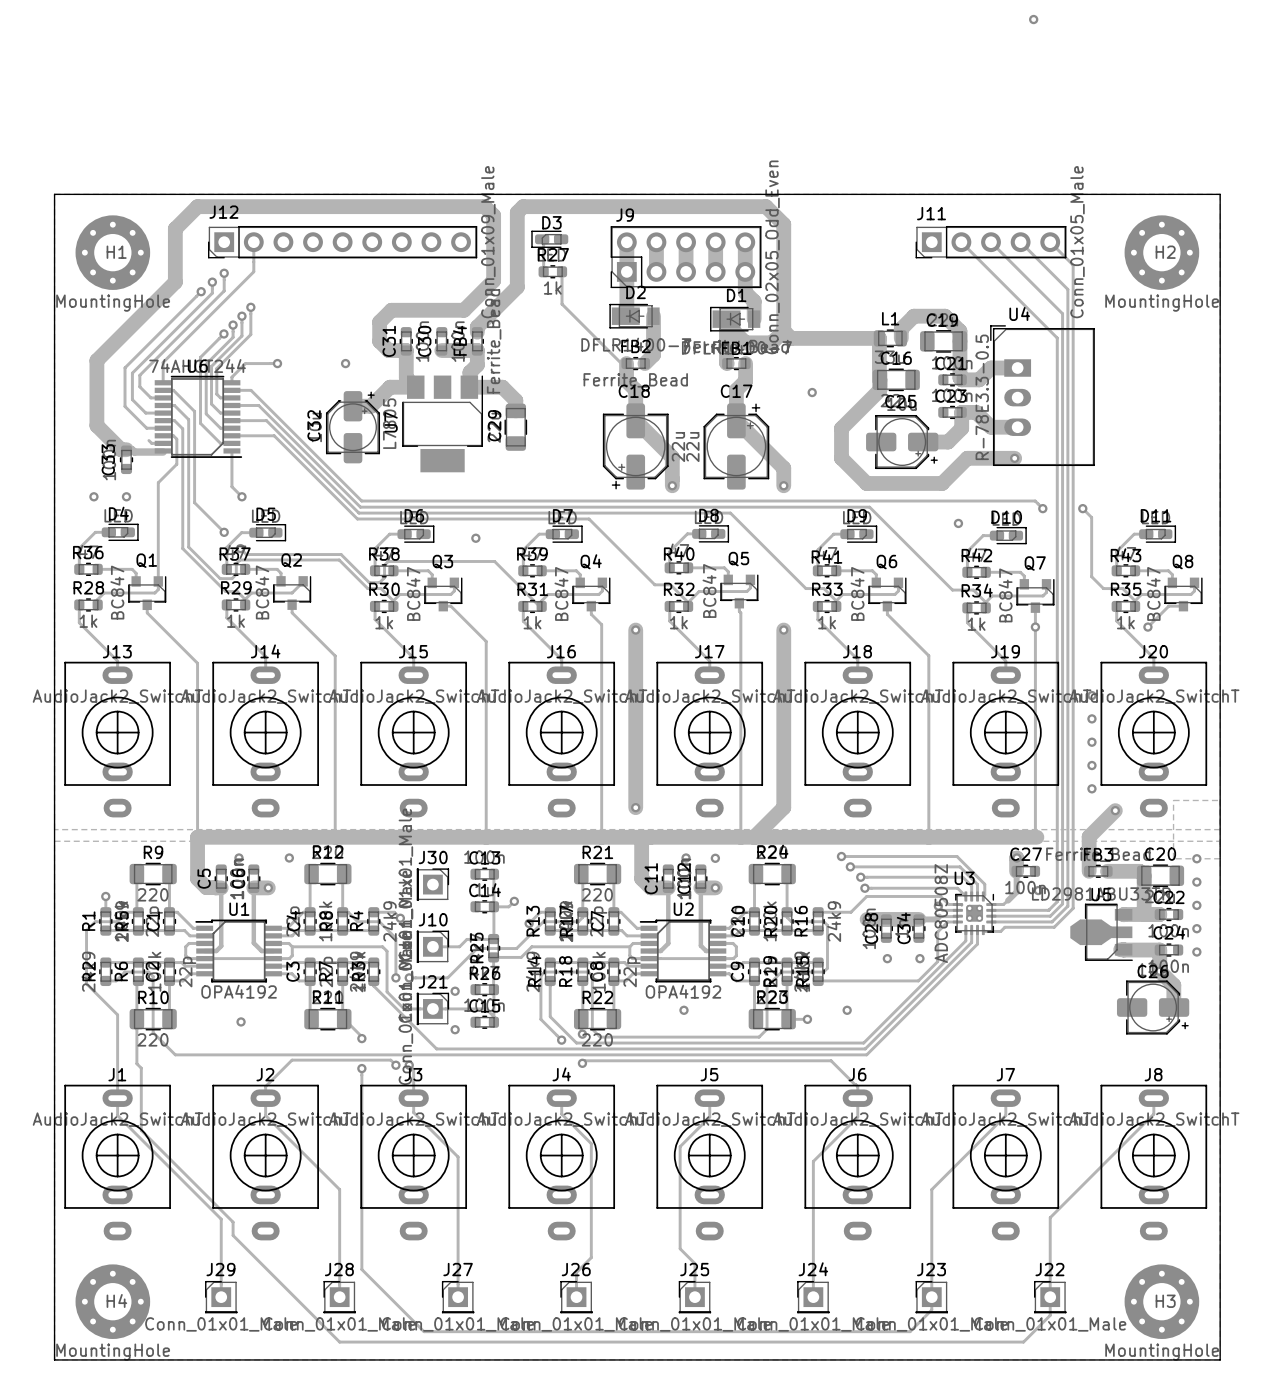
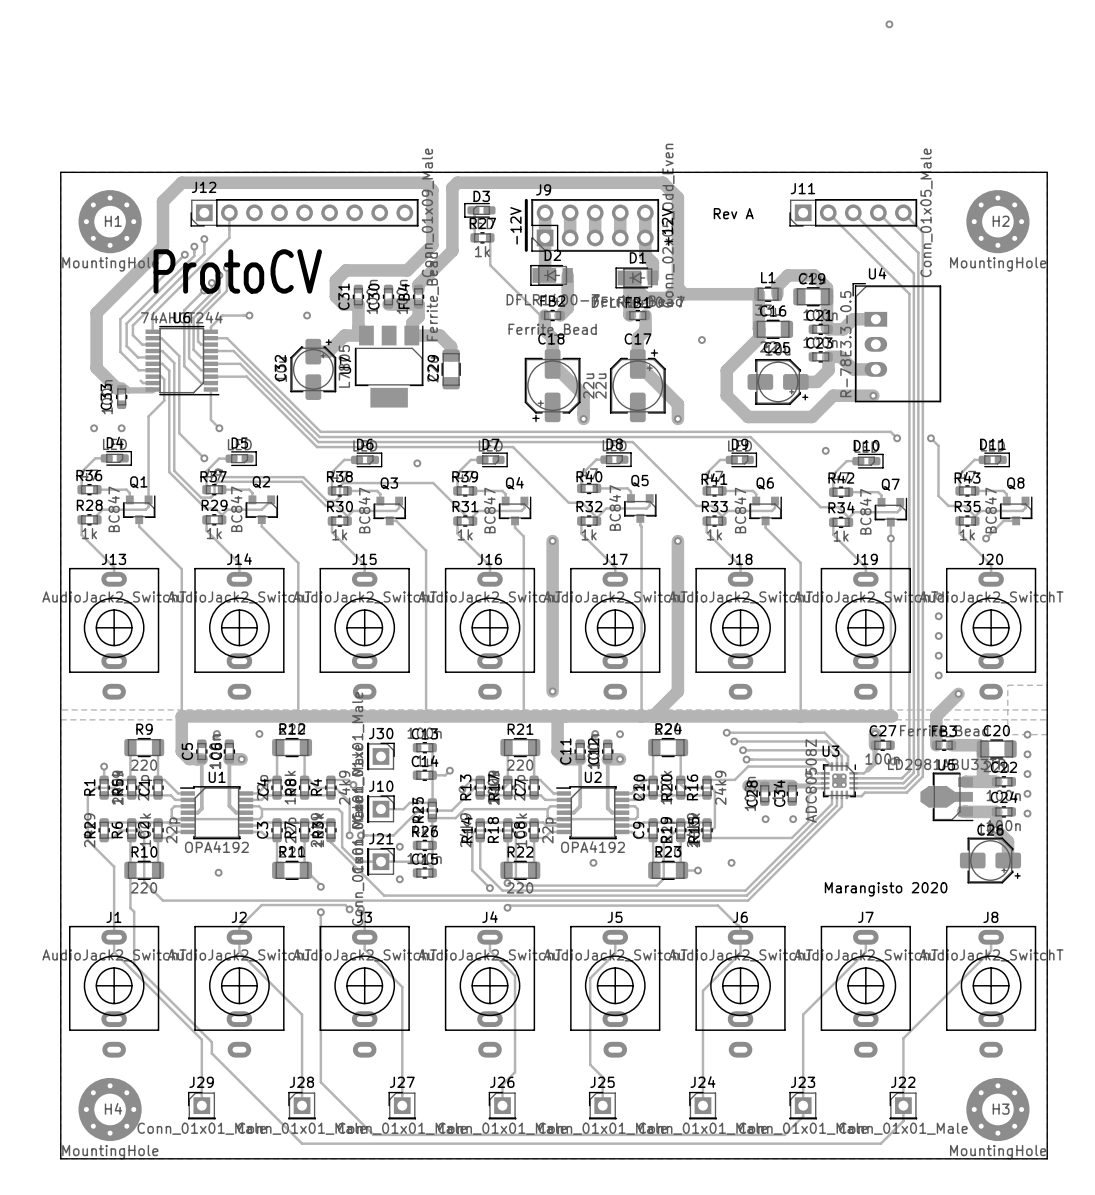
line: none -> (526, 200) (526, 250)
text: none -> Rev A (733, 213)
text: none -> -12V (515, 225)
text: none -> +12V (667, 227)
text: none -> ProtoCV (237, 271)
text: none -> Marangisto 2020 (886, 889)

